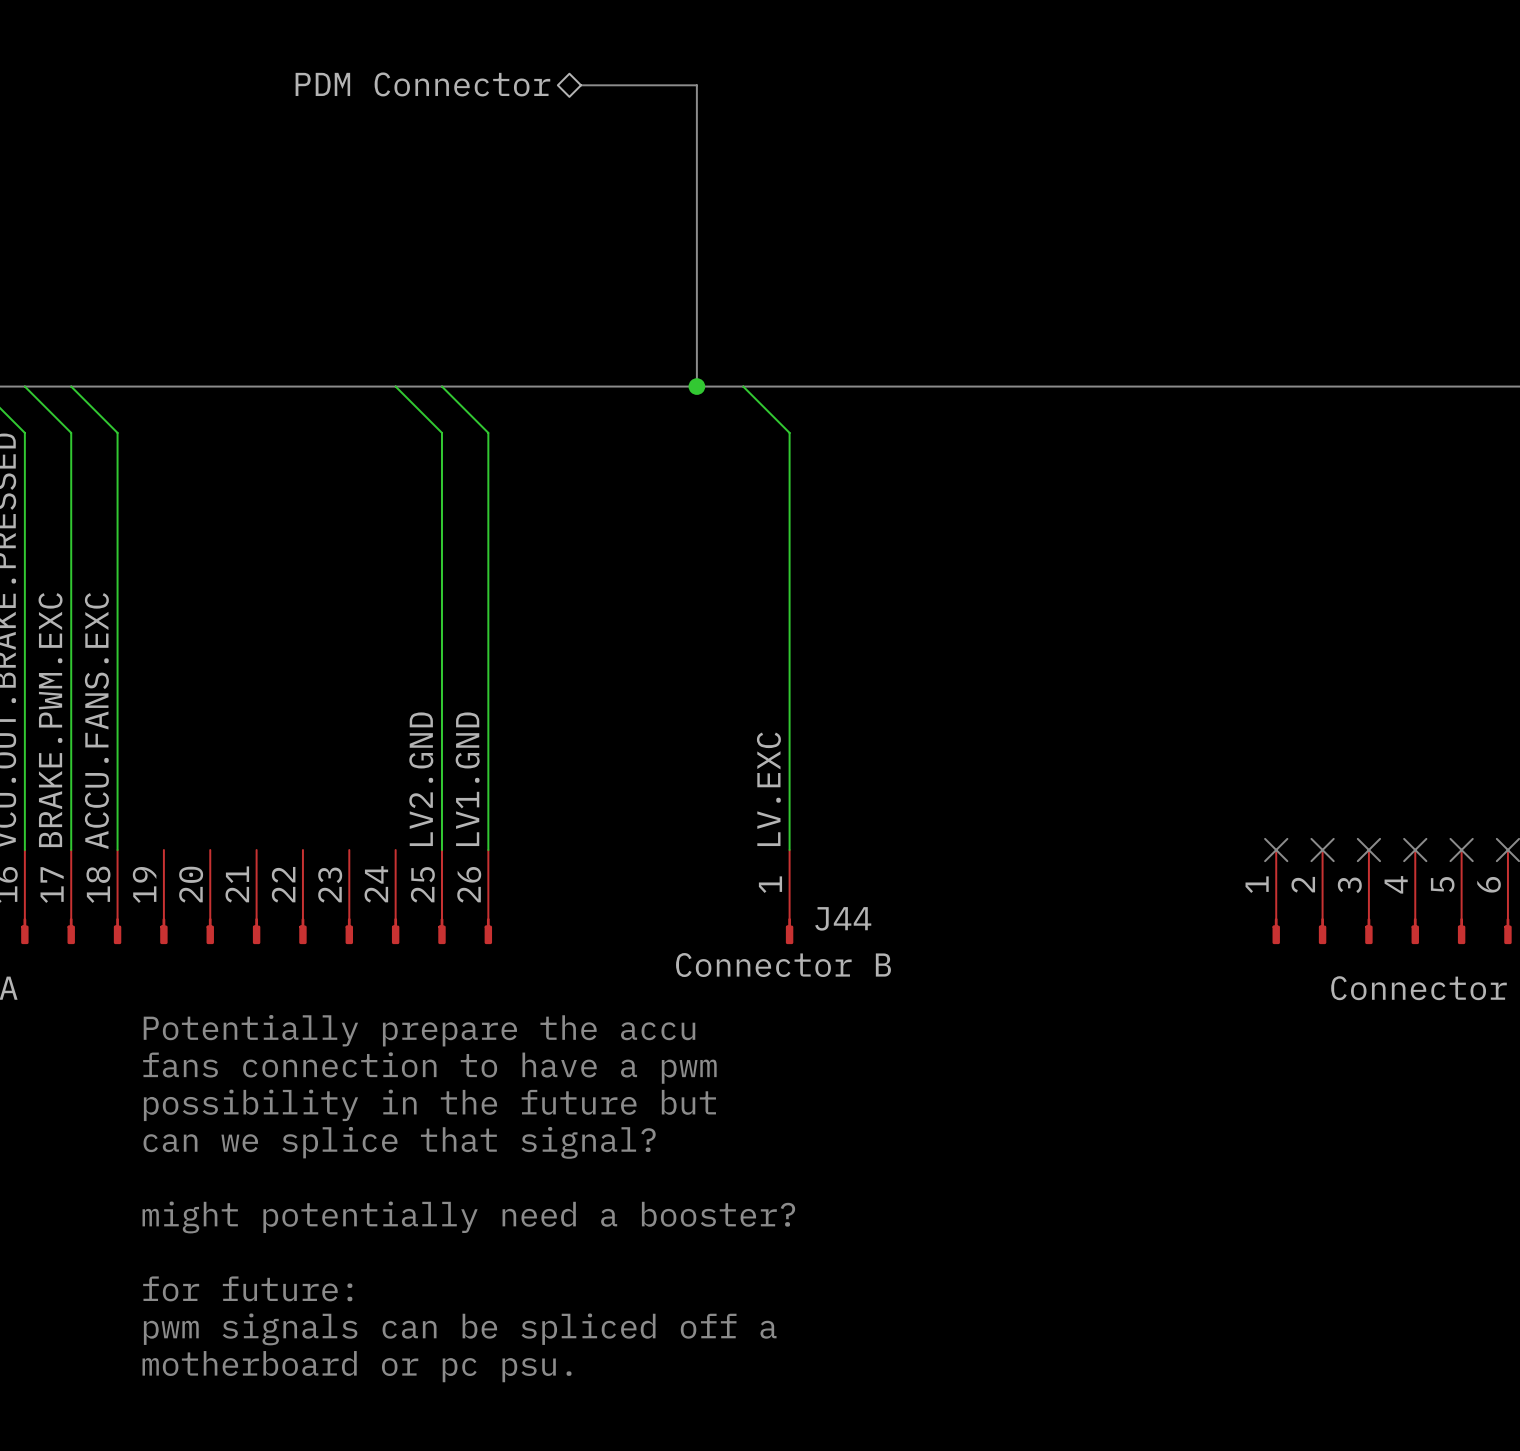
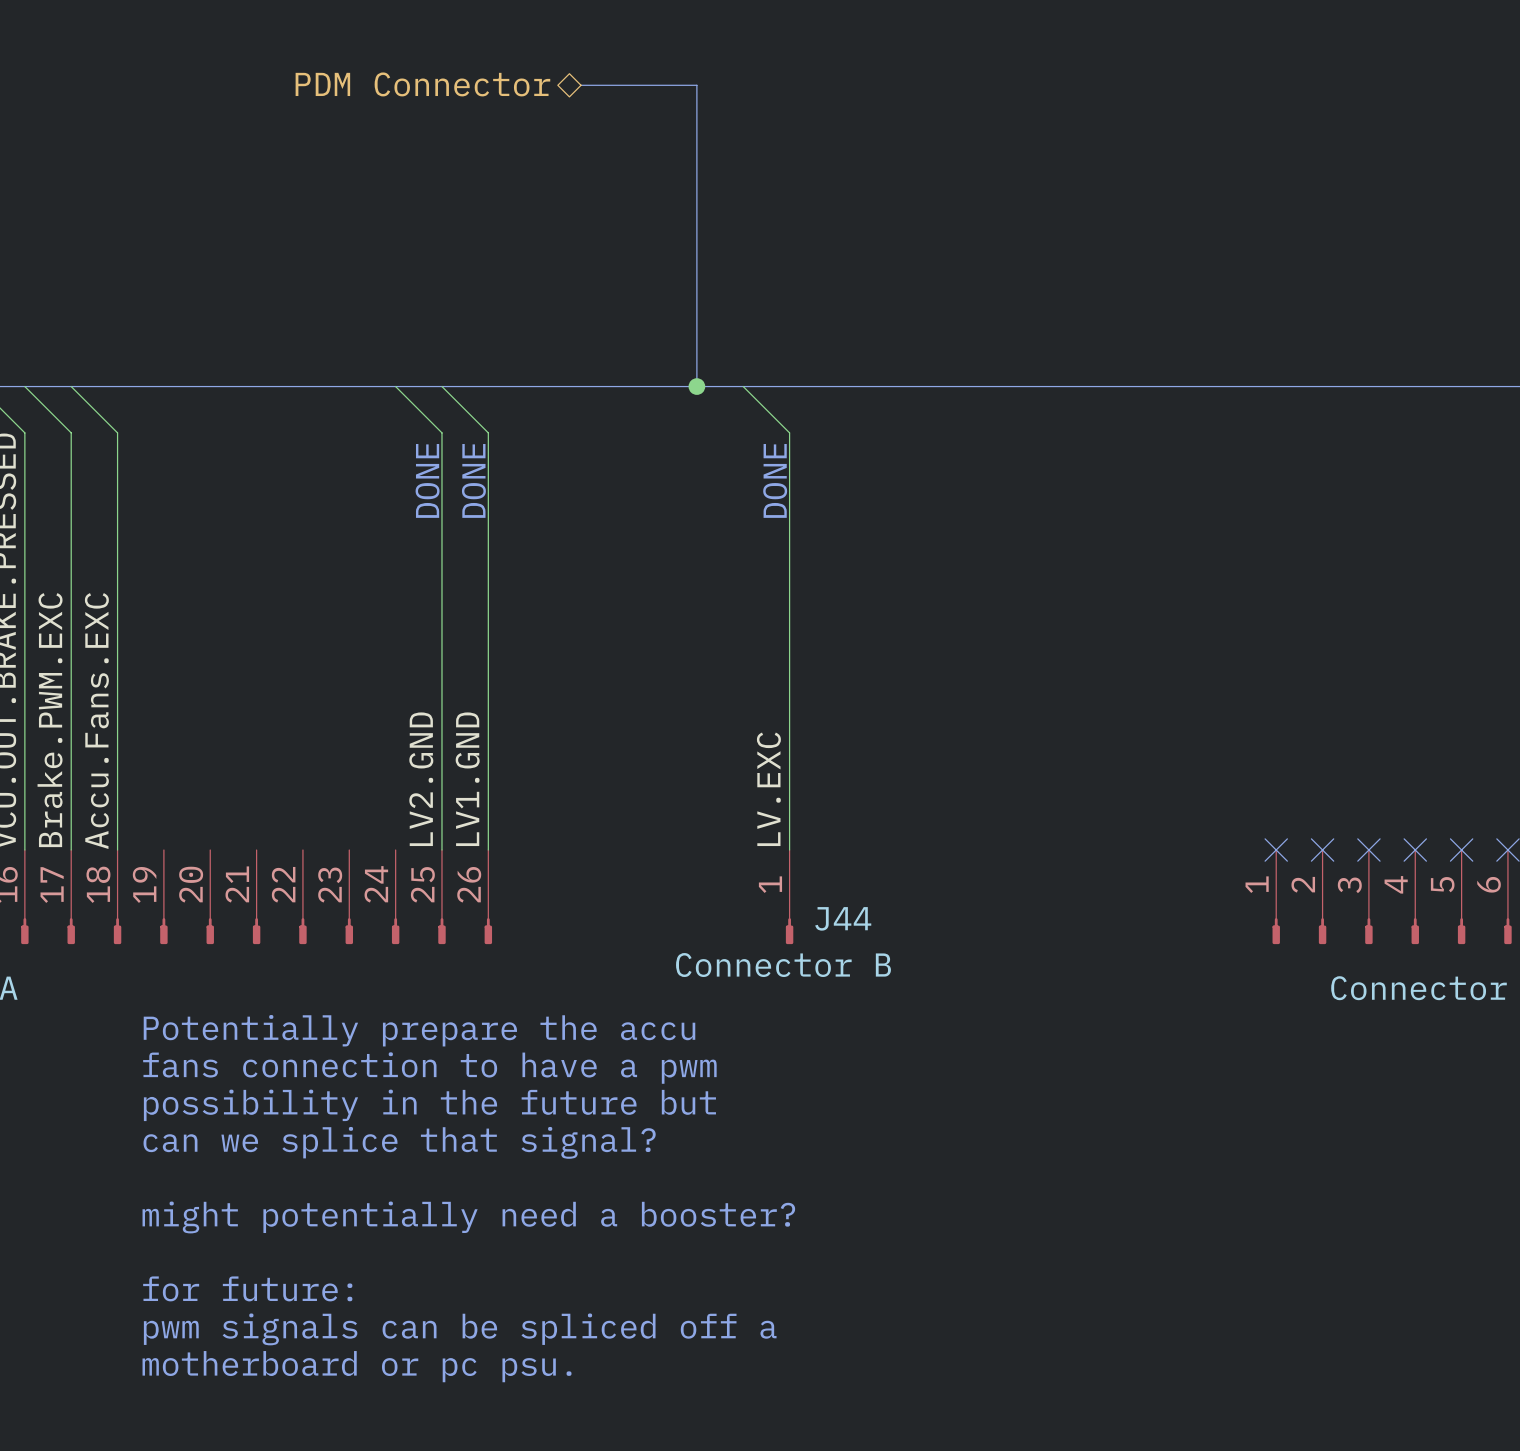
text: none -> DONE (427, 480)
text: none -> DONE (473, 480)
text: none -> DONE (775, 480)
label: BRAKE.PWM.EXC (50, 720) -> Brake.PWM.EXC (50, 720)
label: ACCU.FANS.EXC (96, 721) -> Accu.Fans.EXC (96, 721)

